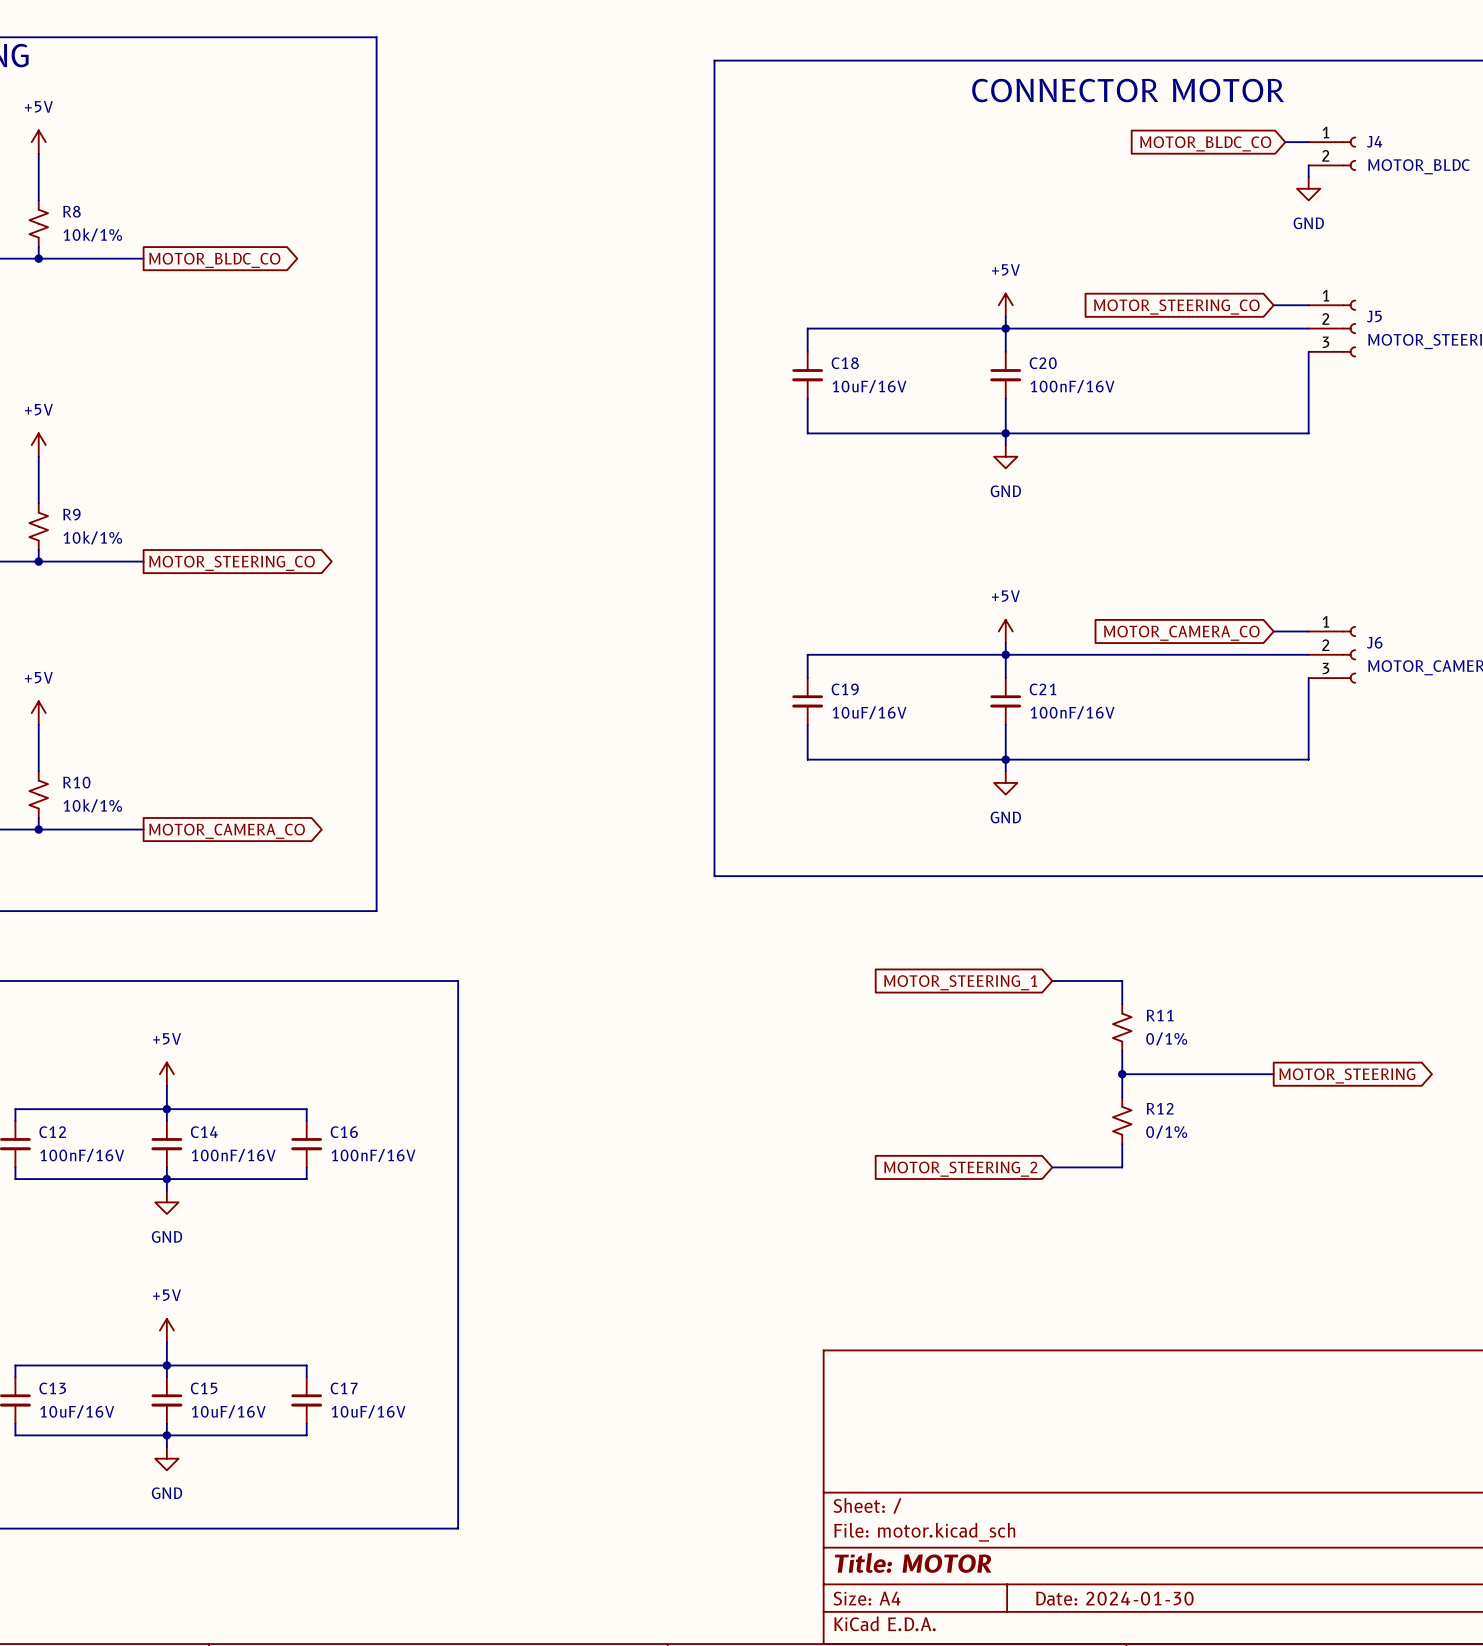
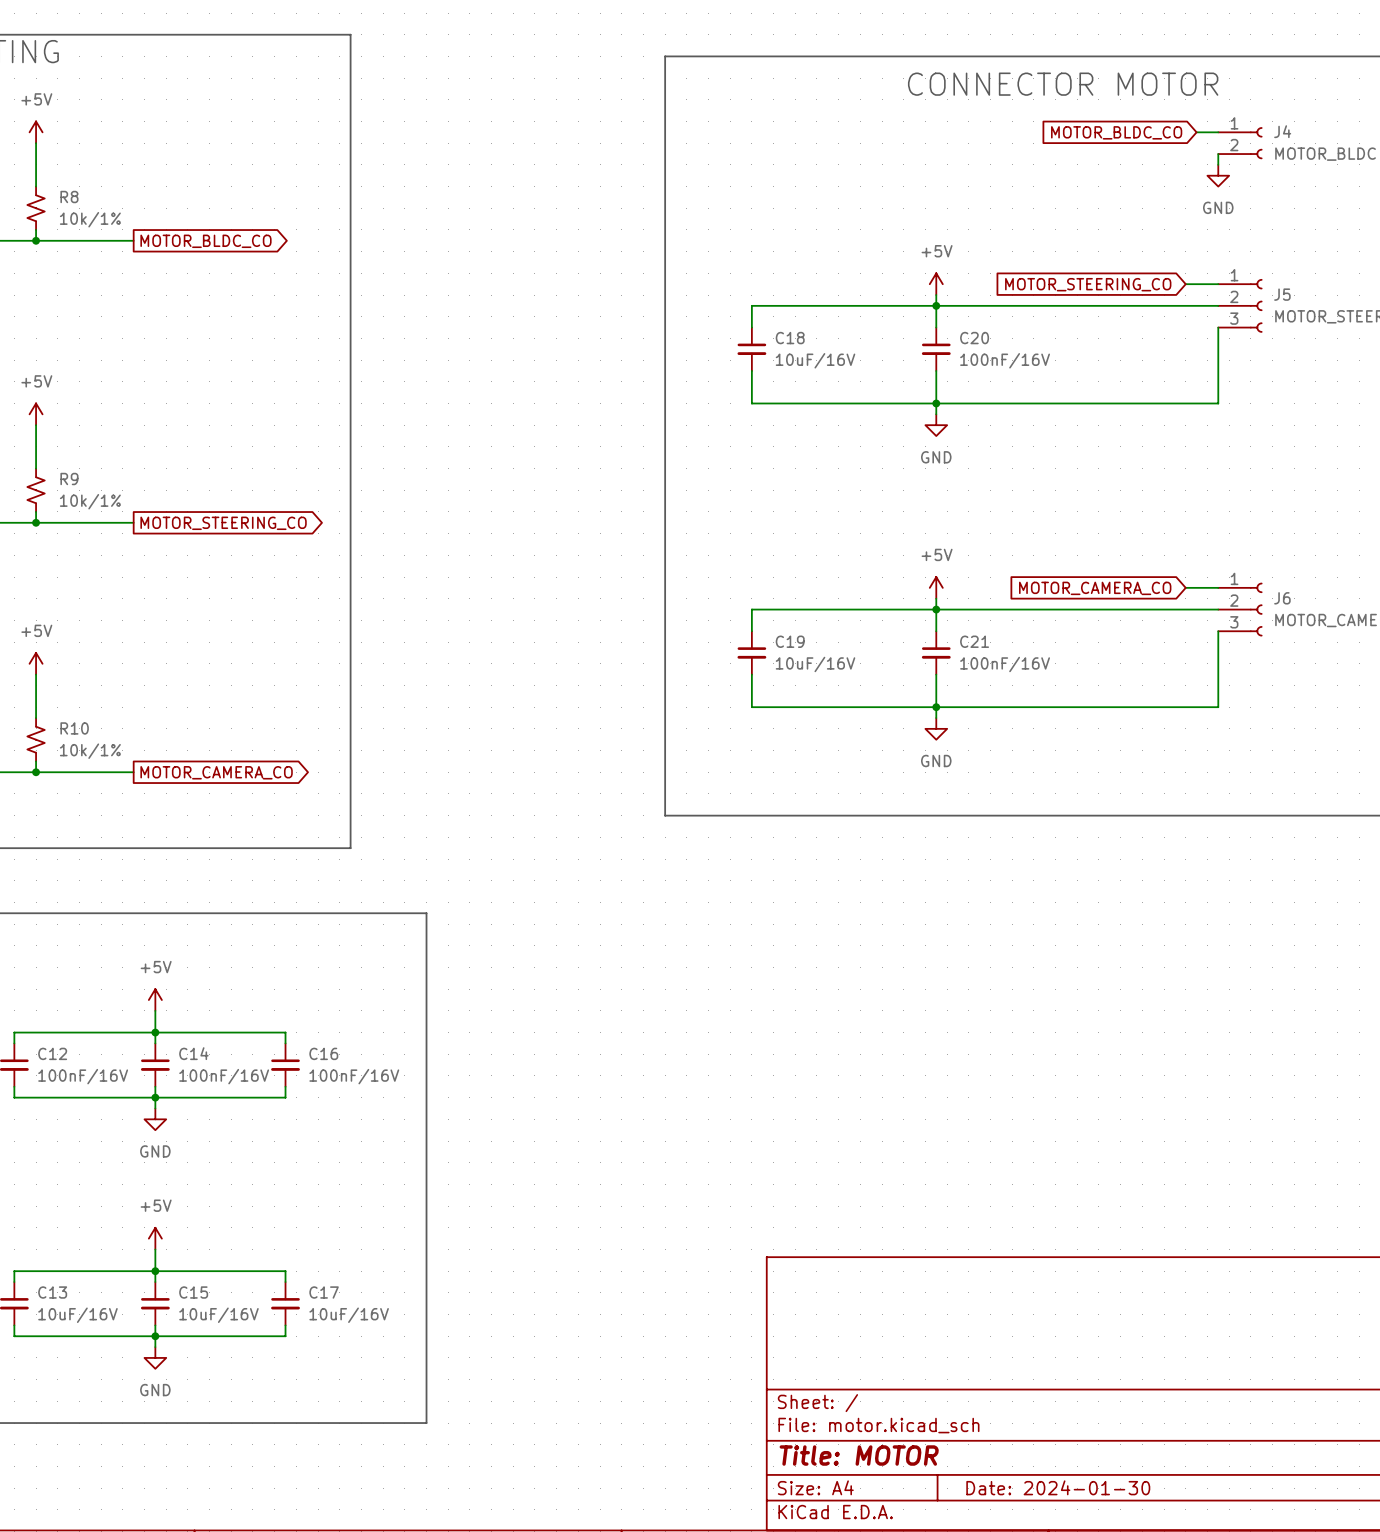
wire: (1052, 981) (1122, 981) (1122, 1004) -> none
global label: MOTOR_STEERING_1 (960, 982) -> none
R11: 0/1% (1122, 1027) -> none
wire: (1122, 1050) (1122, 1097) -> none
wire: (1122, 1074) (1273, 1074) -> none
junction: (1122, 1074) -> none
global label: MOTOR_STEERING (1347, 1075) -> none
R12: 0/1% (1122, 1120) -> none
wire: (1122, 1144) (1122, 1167) (1052, 1167) -> none
global label: MOTOR_STEERING_2 (960, 1169) -> none

